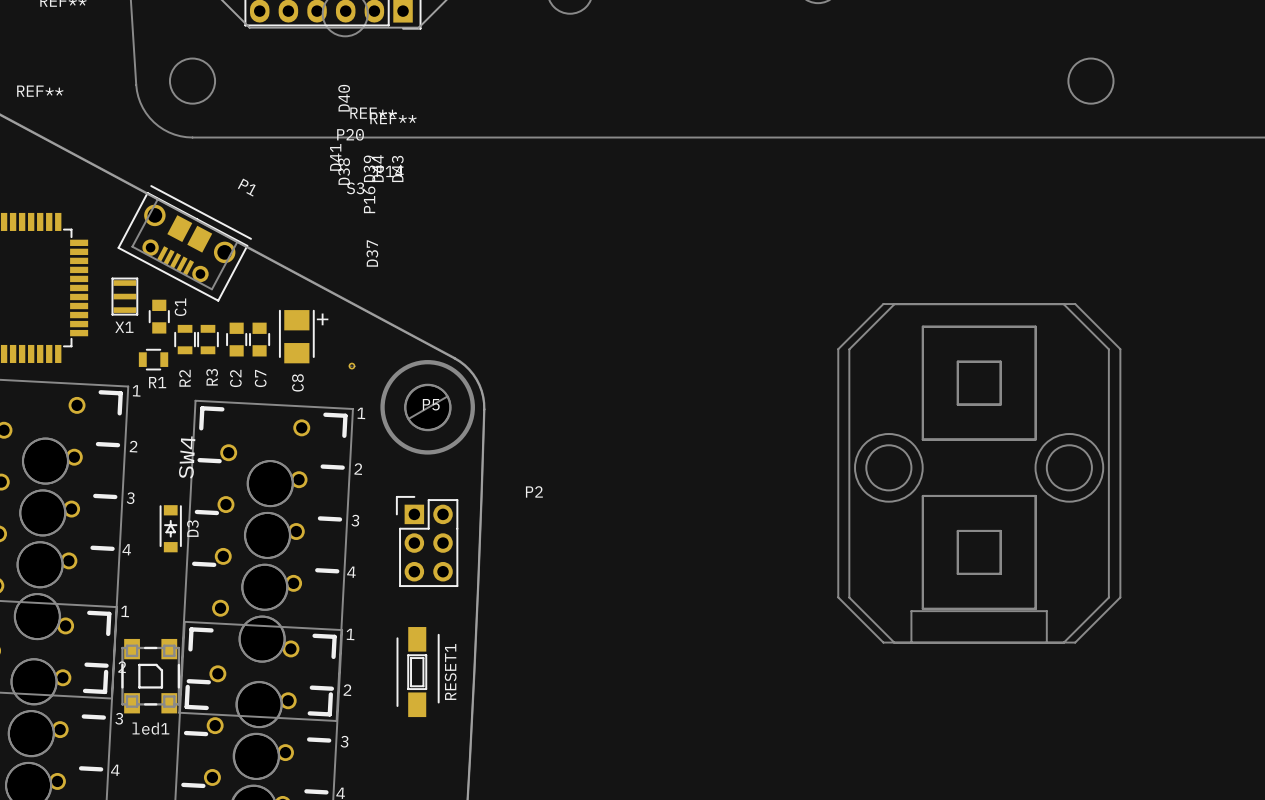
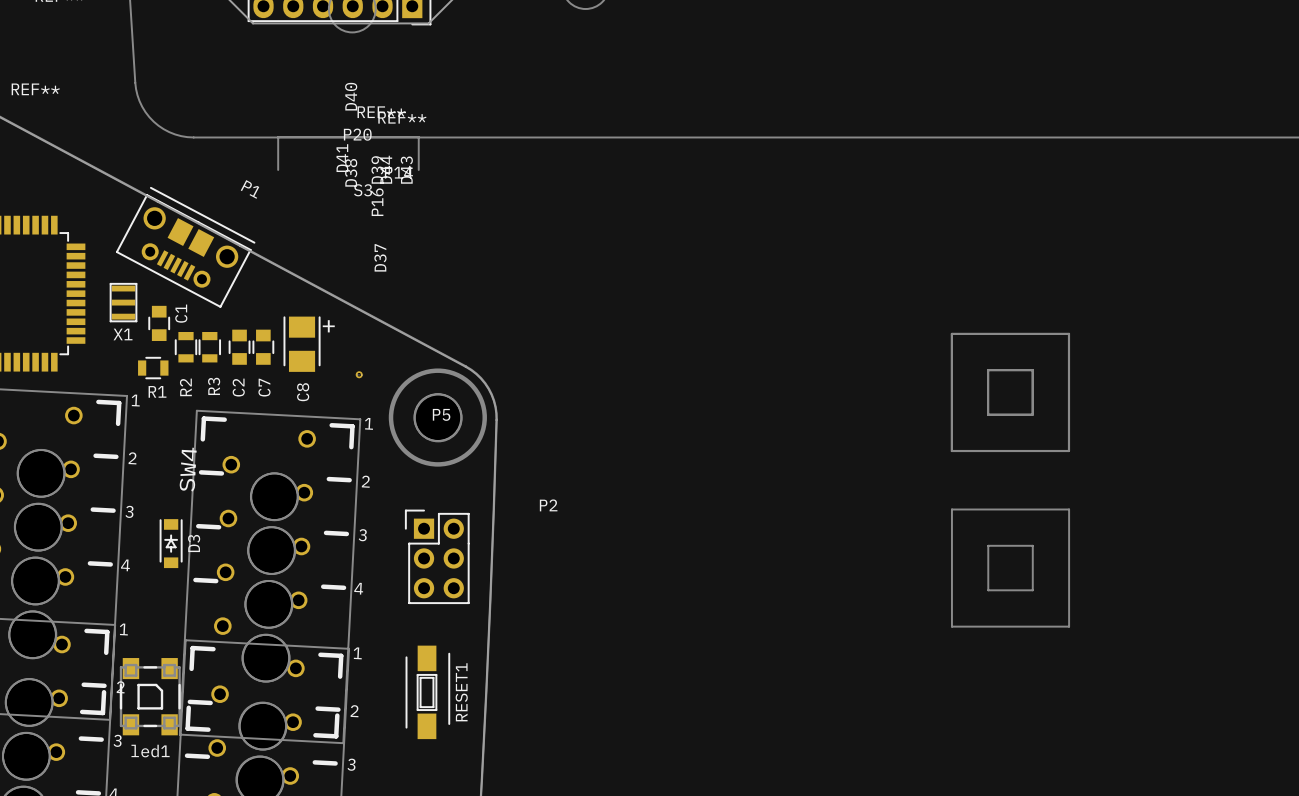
drawing: [169, 57, 216, 105] -> none
drawing: [1067, 57, 1115, 105] -> none
line: none -> (278, 169) (278, 137) (418, 137) (418, 169)
line: (157, 198) (132, 246) (211, 289) (237, 241) -> none
line: (883, 304) (1075, 304) (1120, 349) (1120, 597) (1075, 642) (883, 642) (838, 597) (838, 349) (883, 304) -> none
line: (894, 304) (849, 349) (849, 597) (894, 642) (1063, 642) (1108, 597) (1108, 349) (1063, 304) (894, 304) -> none
line: (447, 396) (408, 418) -> none
drawing: [854, 433, 924, 503] -> none
drawing: [1034, 433, 1104, 503] -> none
line: (911, 642) (911, 611) (1046, 611) (1046, 642) -> none

